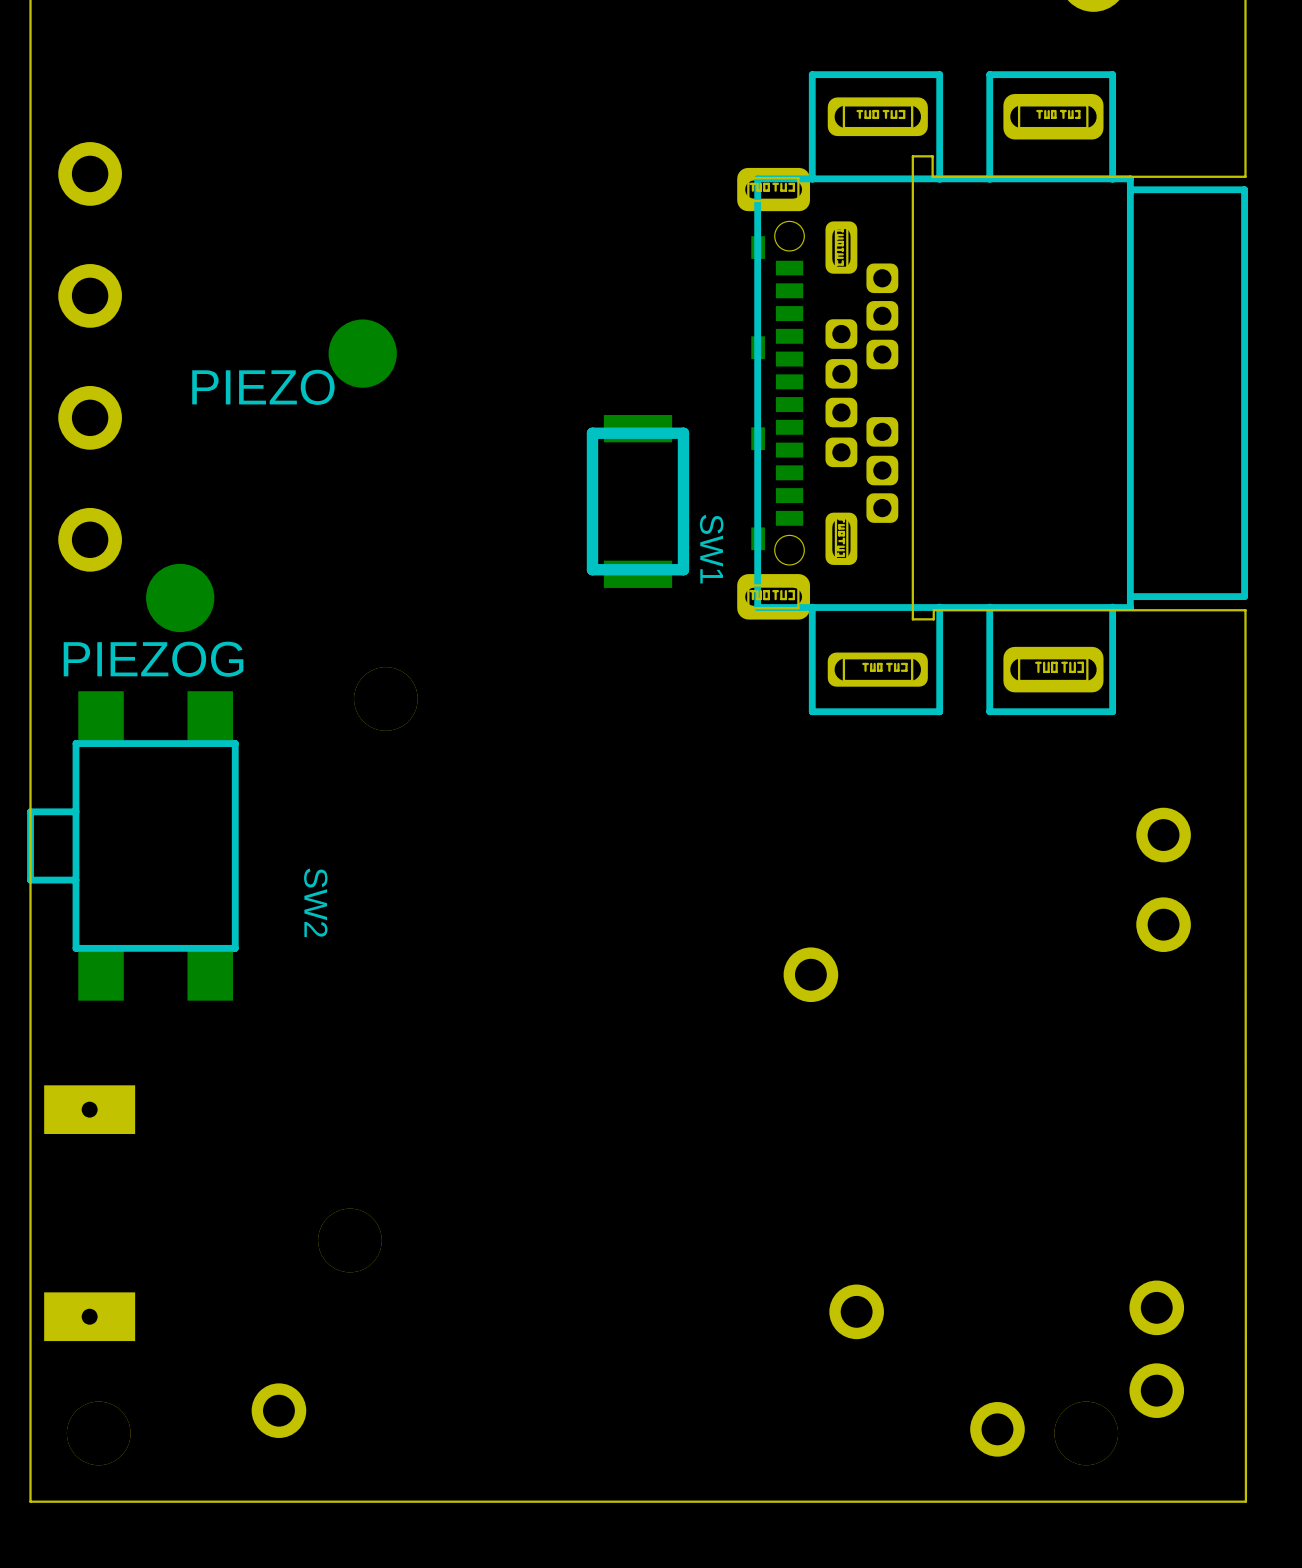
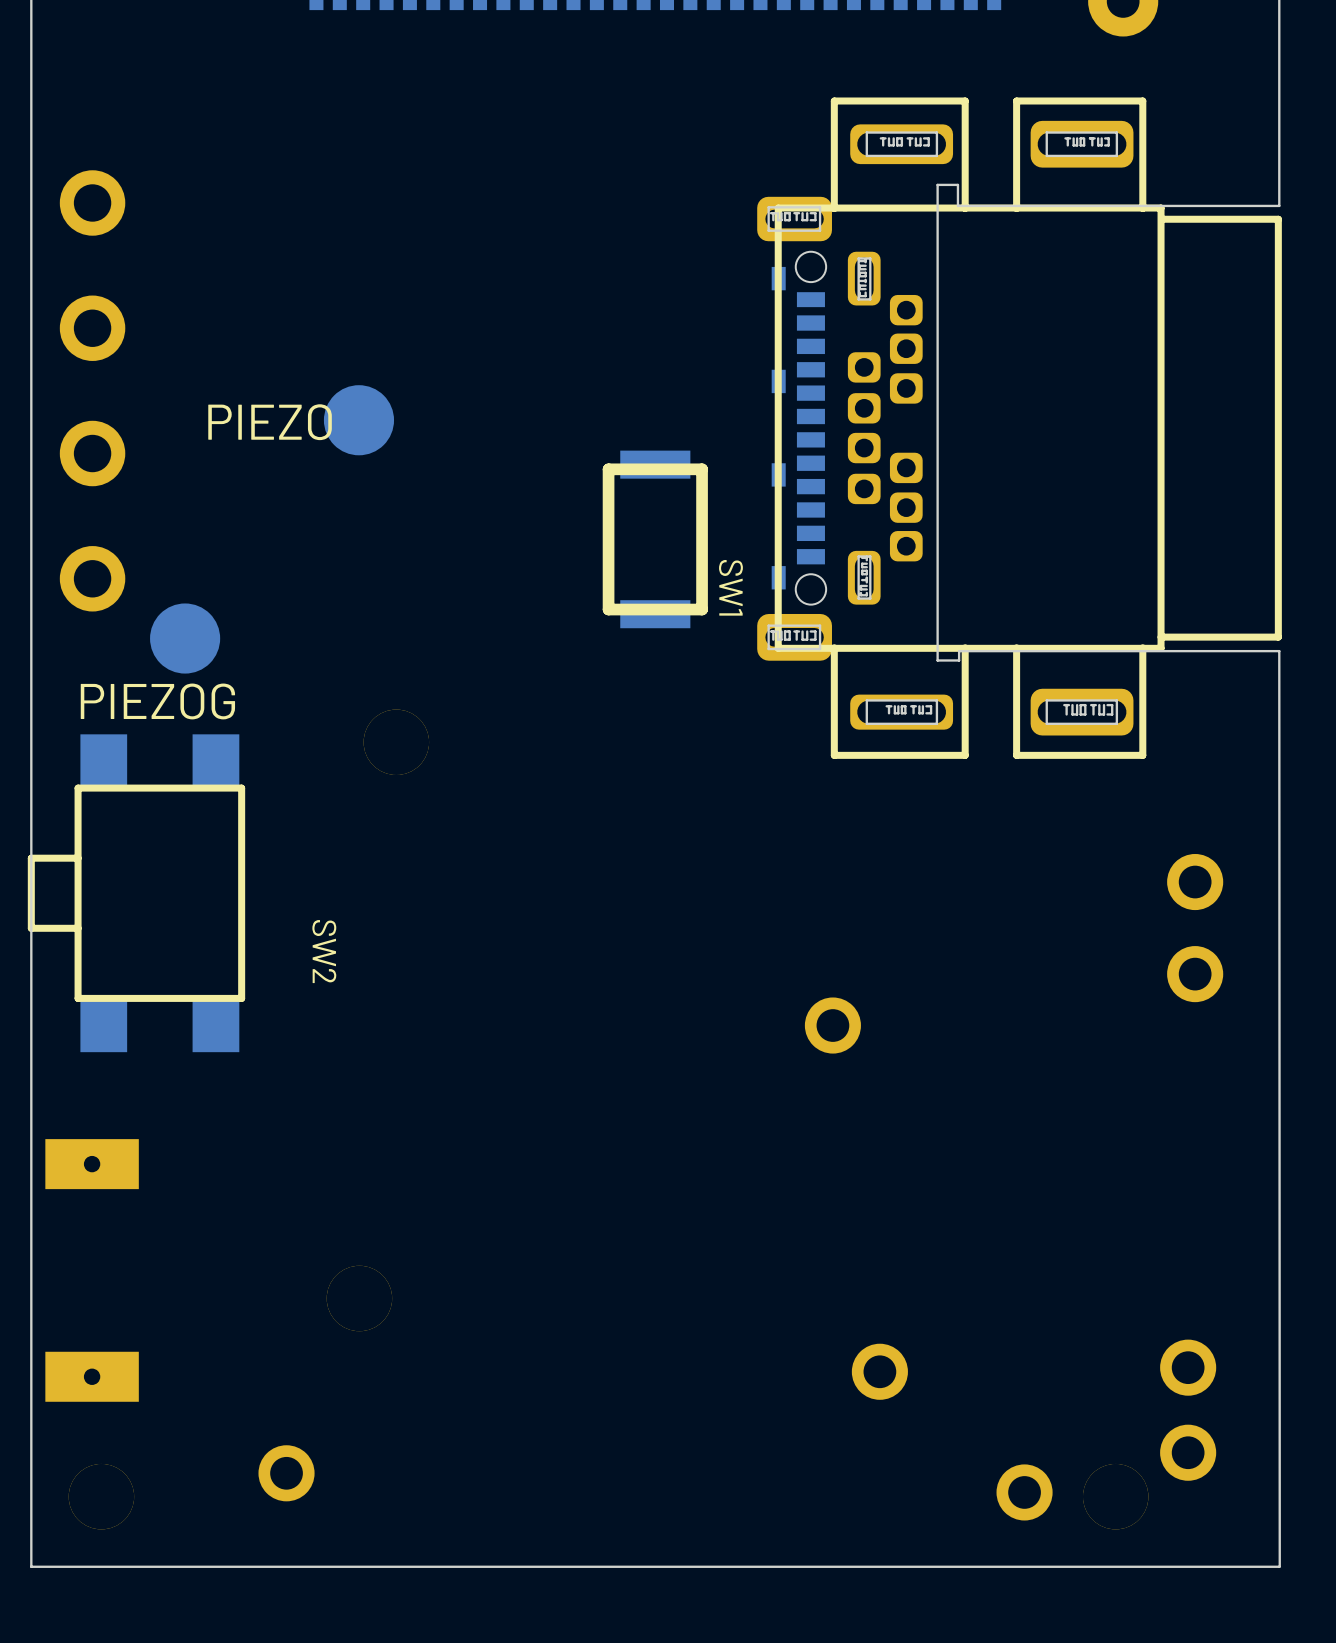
part position: (362, 353) -> (358, 420)

